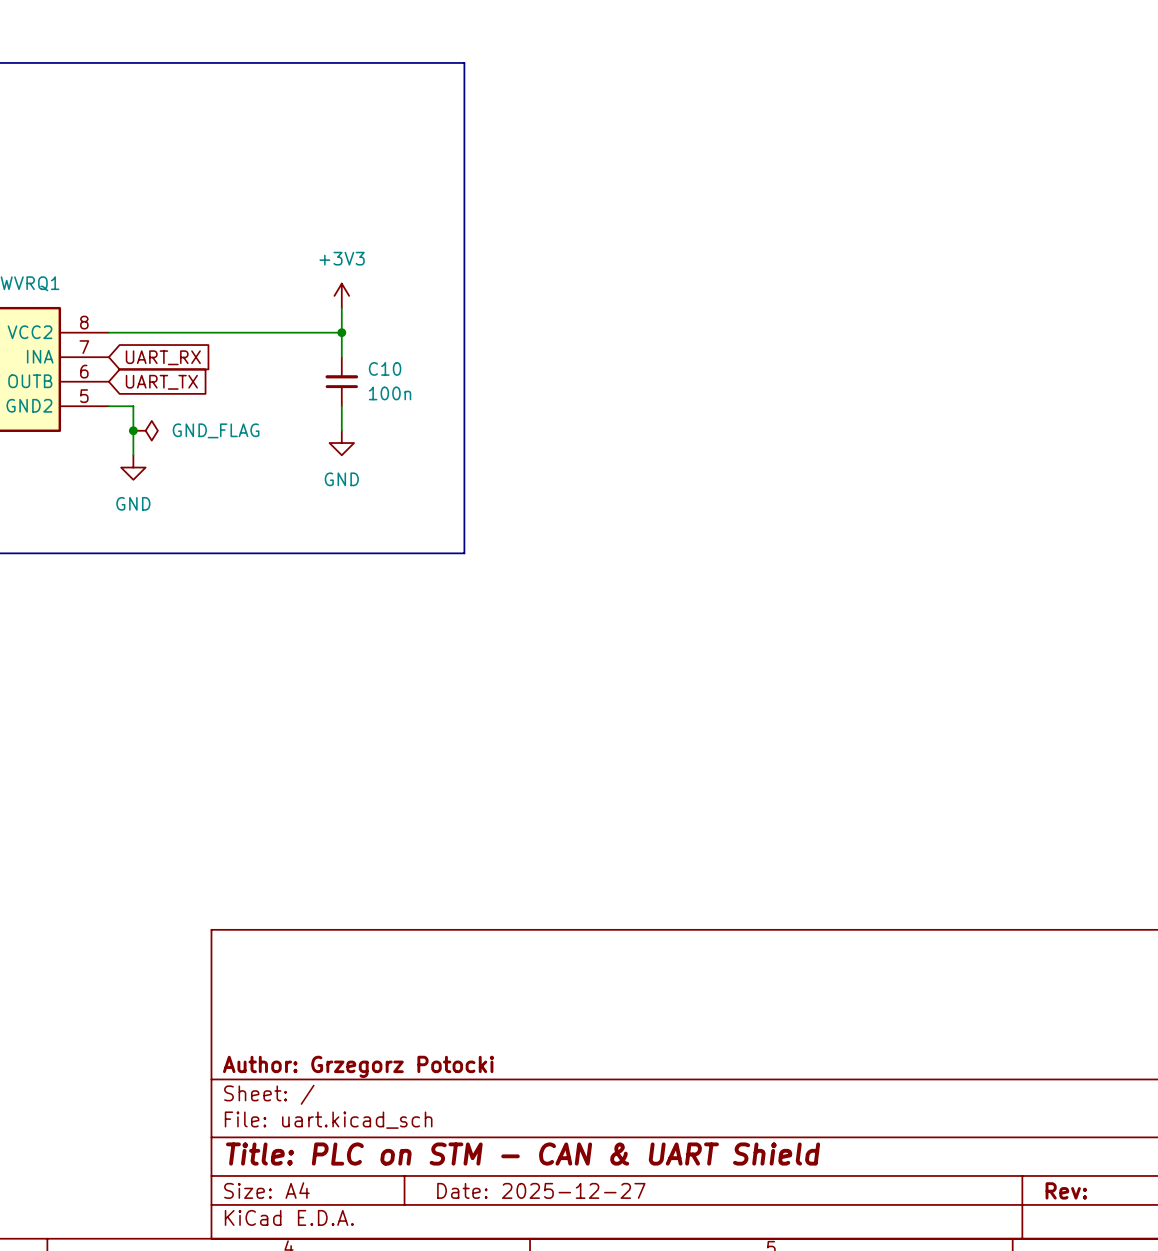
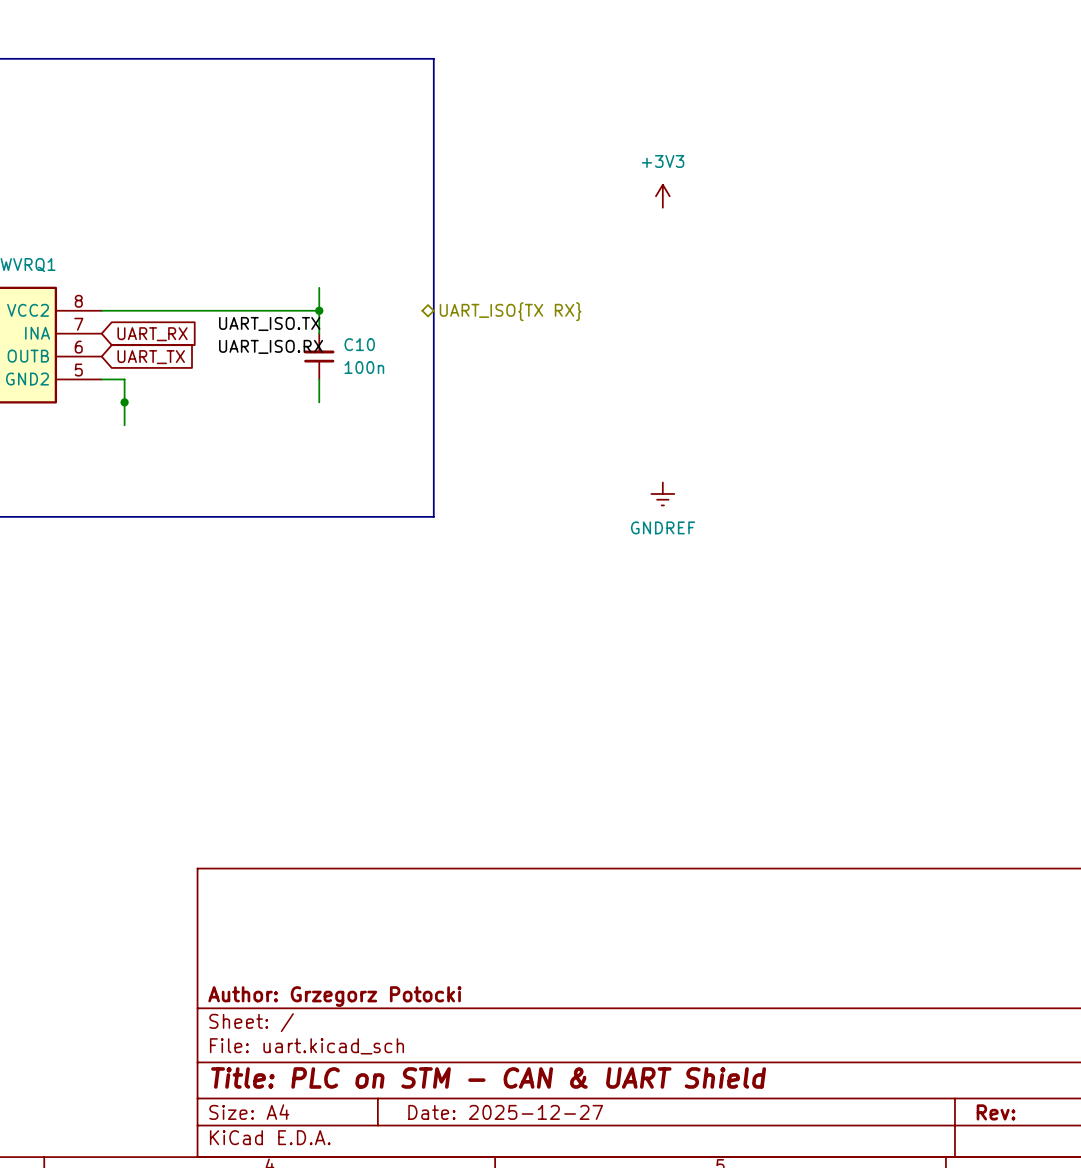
power symbol: none -> +3V3 (662, 196)
power symbol: +3V3 (341, 295) -> none
hierarchical label: none -> UART_ISO{TX RX} (510, 311)
label: none -> UART_ISO.TX (269, 323)
label: none -> UART_ISO.RX (271, 346)
power symbol: GND_FLAG (145, 430) -> none
power symbol: GND (341, 443) -> none
power symbol: GND (133, 467) -> none
power symbol: none -> GNDREF (662, 493)

